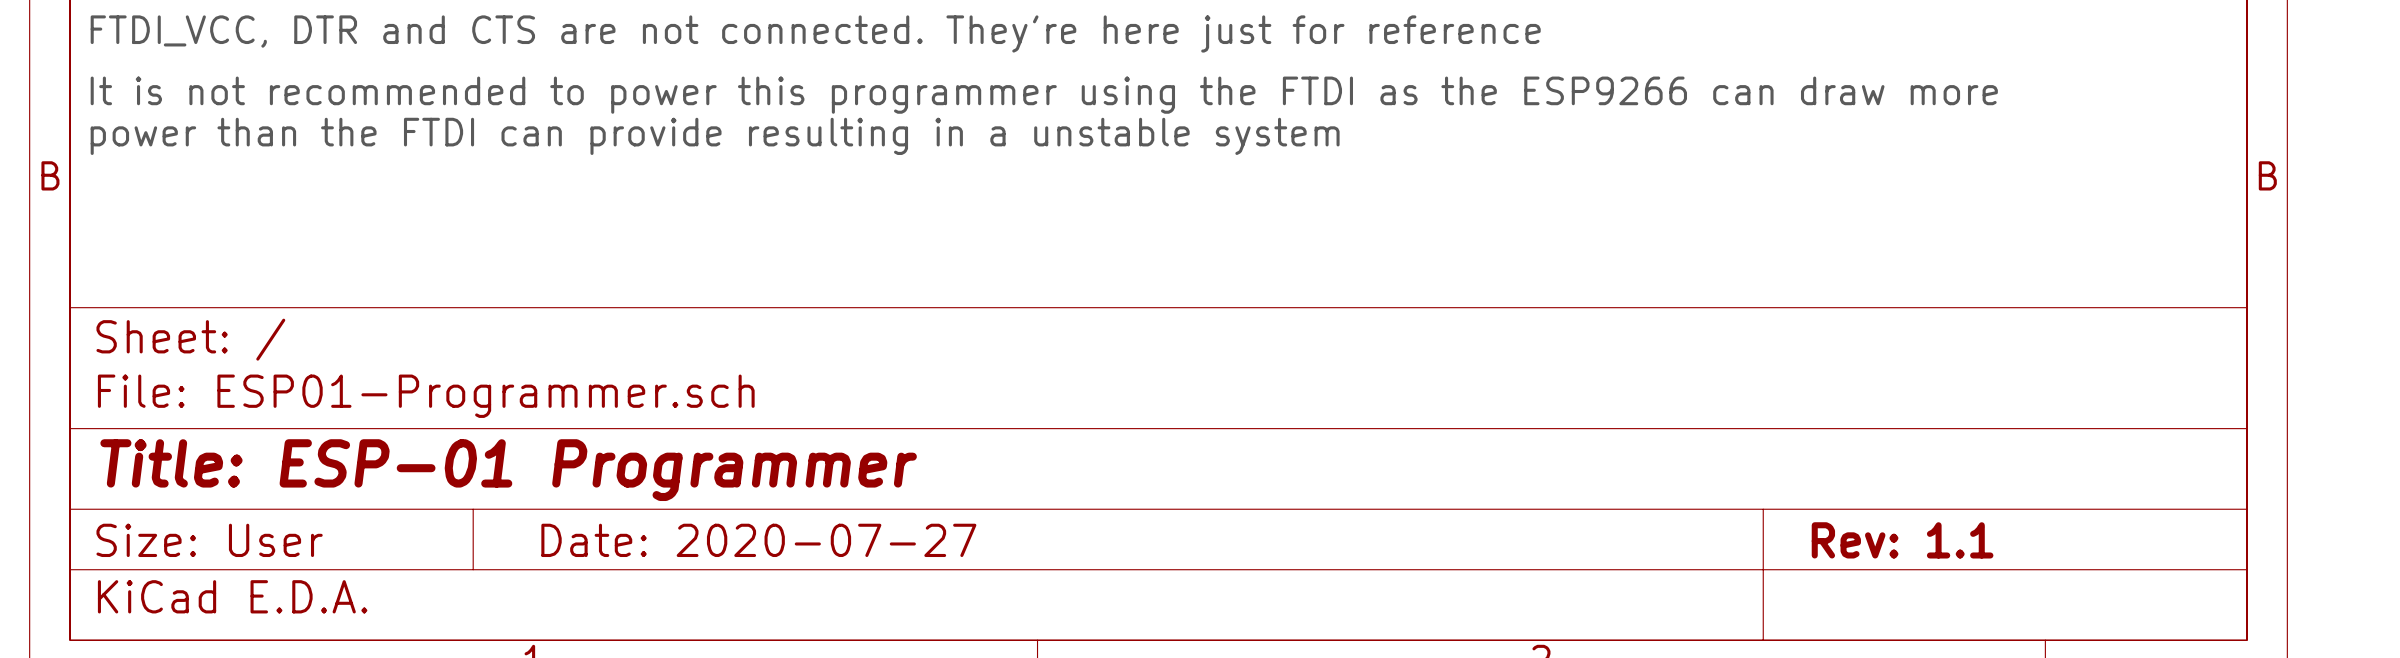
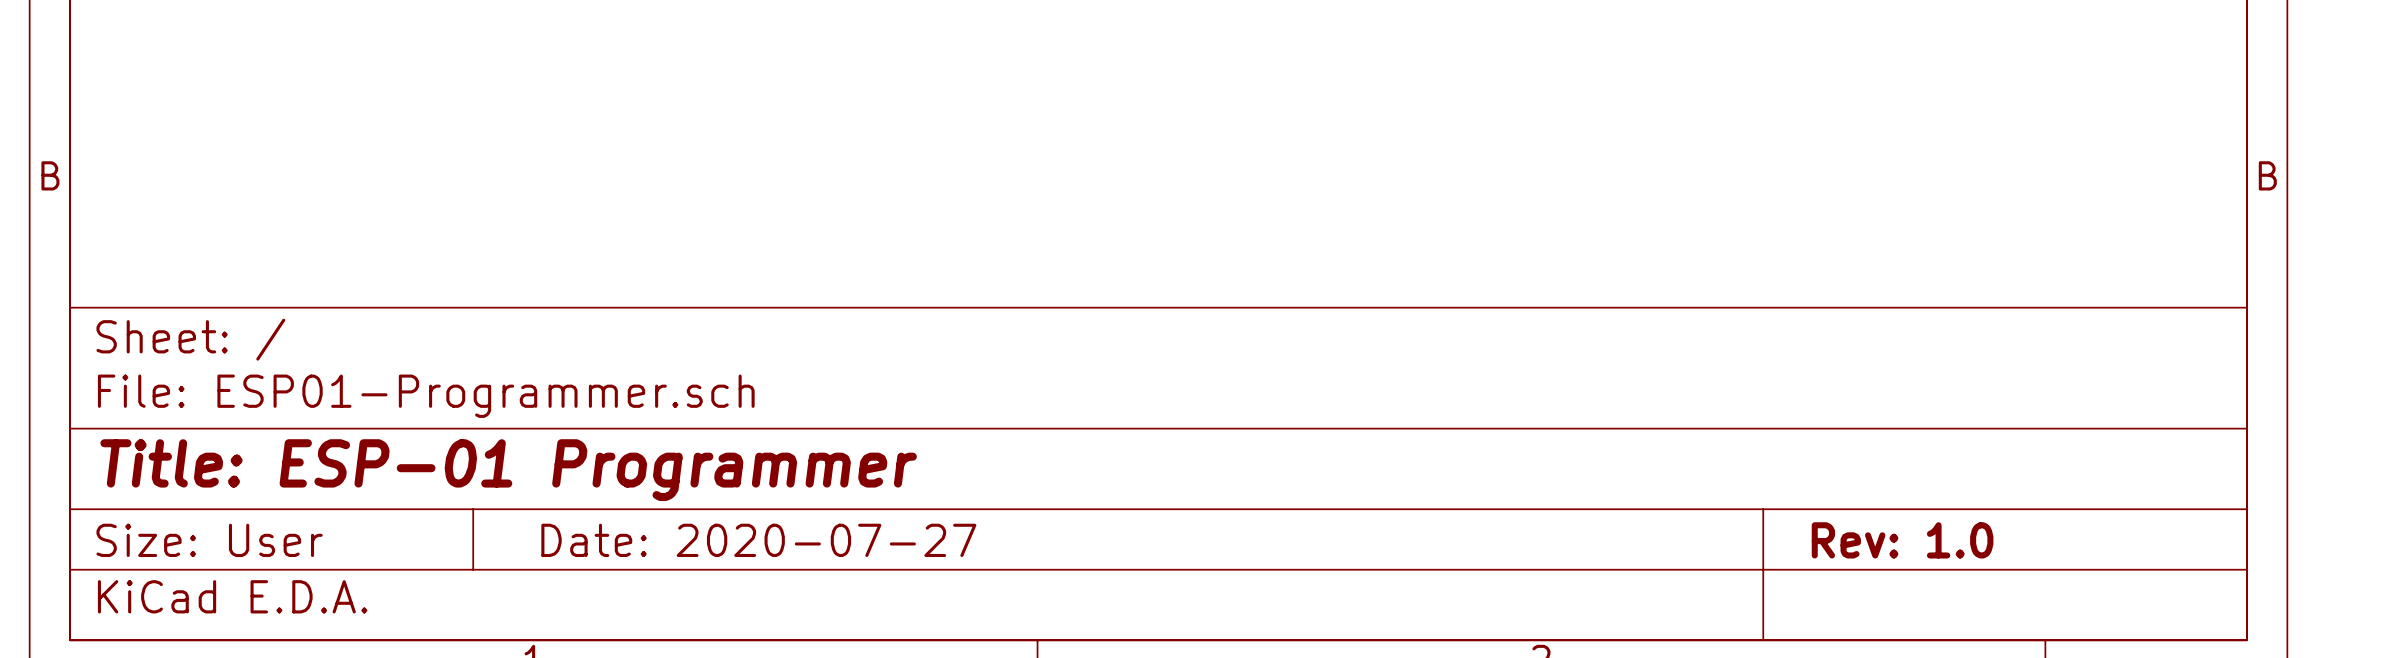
text: FTDI_VCC, DTR and CTS are not connected. They're here just for reference (815, 33) -> none
text: It is not recommended to power this programmer using the FTDI as the ESP9266 can draw more (1044, 95) -> none
text: power than the FTDI can provide resulting in a unstable system (715, 136) -> none
title block: Rev: 1.1 (1902, 540) -> Rev: 1.0 (1902, 540)

